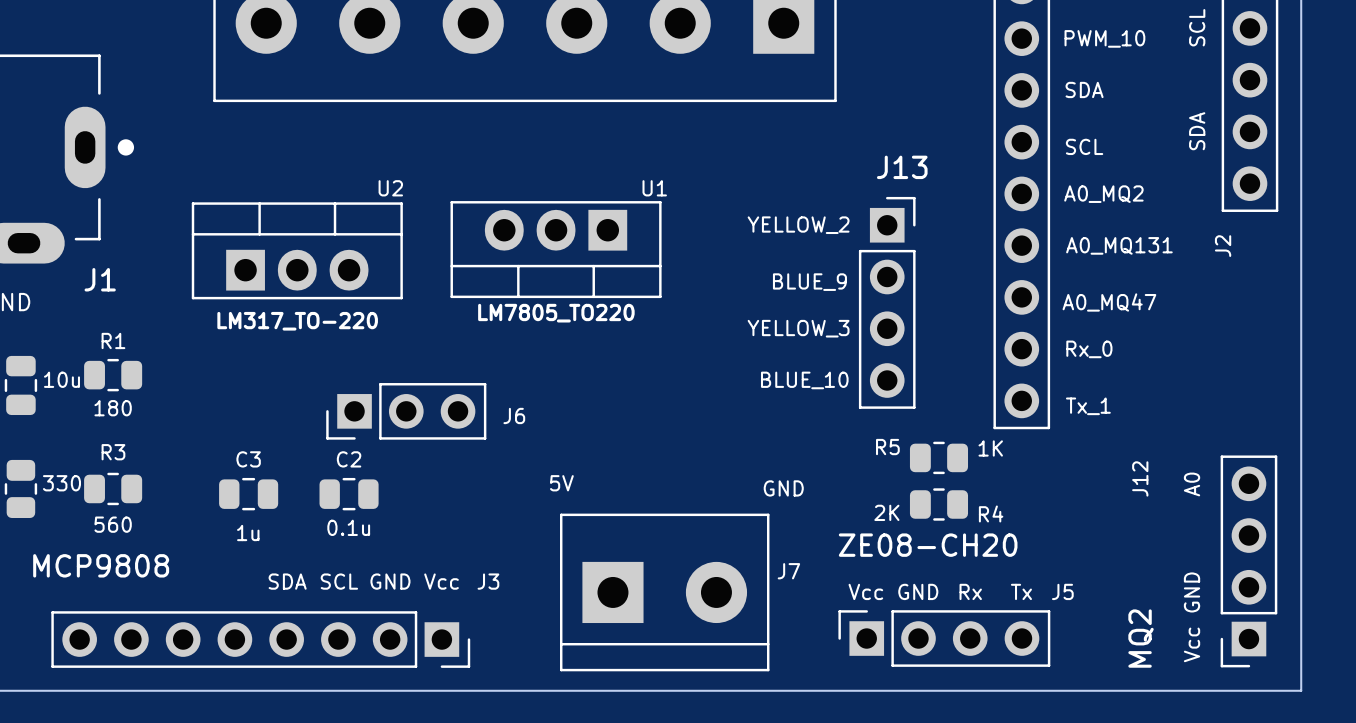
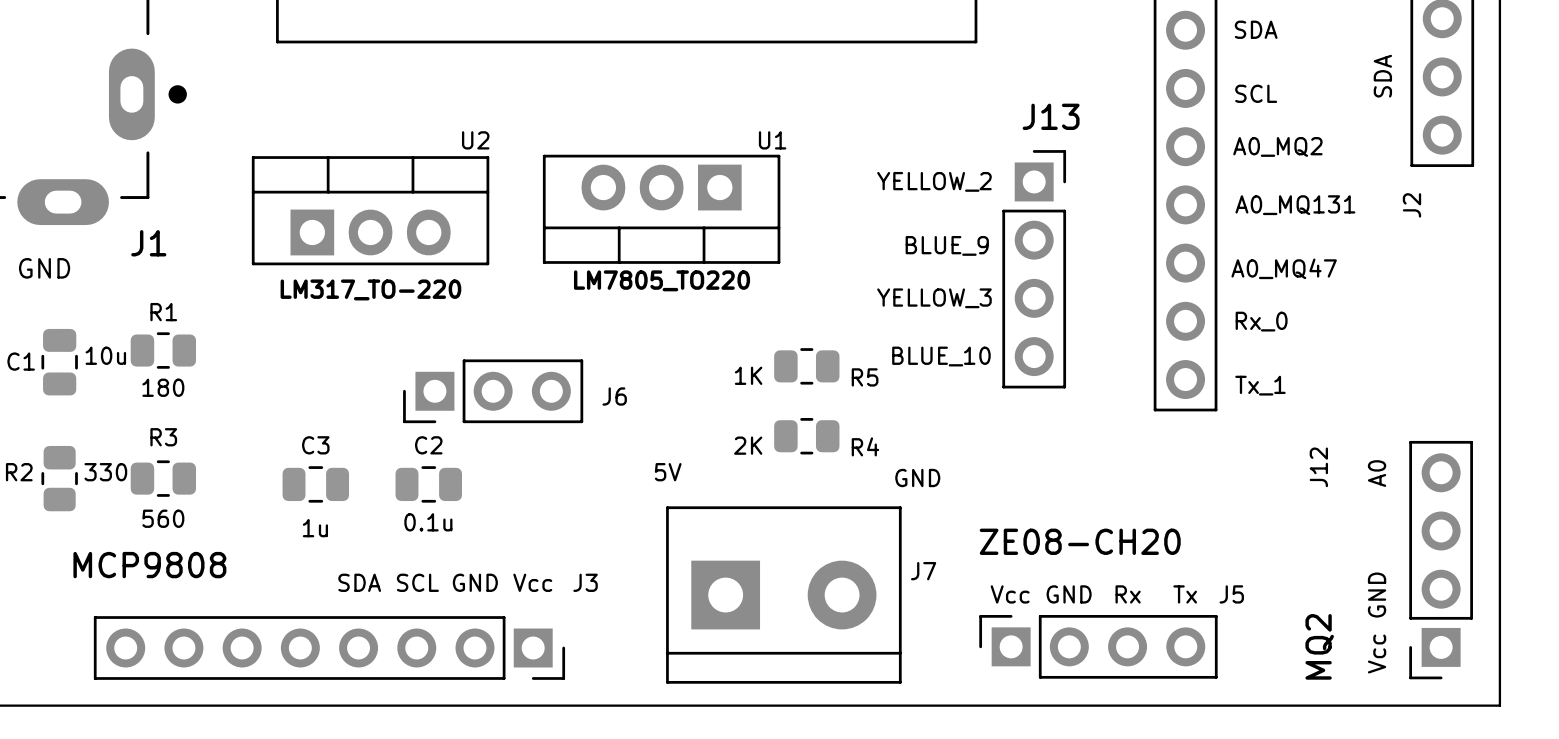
R5 name position: R5 (887, 447) -> R5 (865, 377)
R5 value position: 1K (990, 448) -> 1K (748, 375)
R5 position: (938, 457) -> (806, 366)
R4 position: (938, 504) -> (806, 436)

